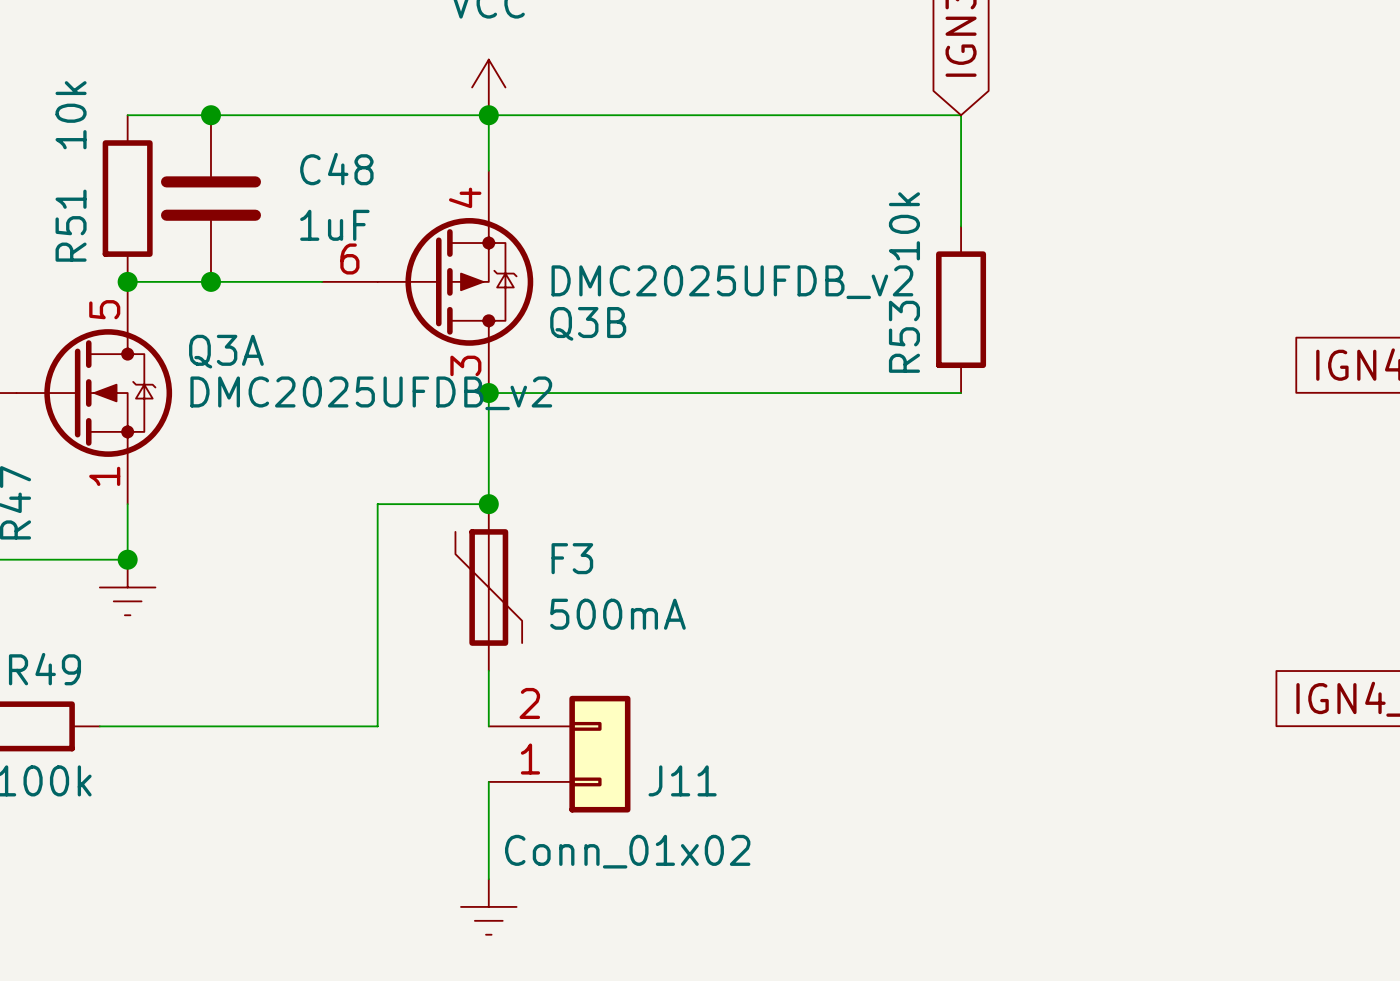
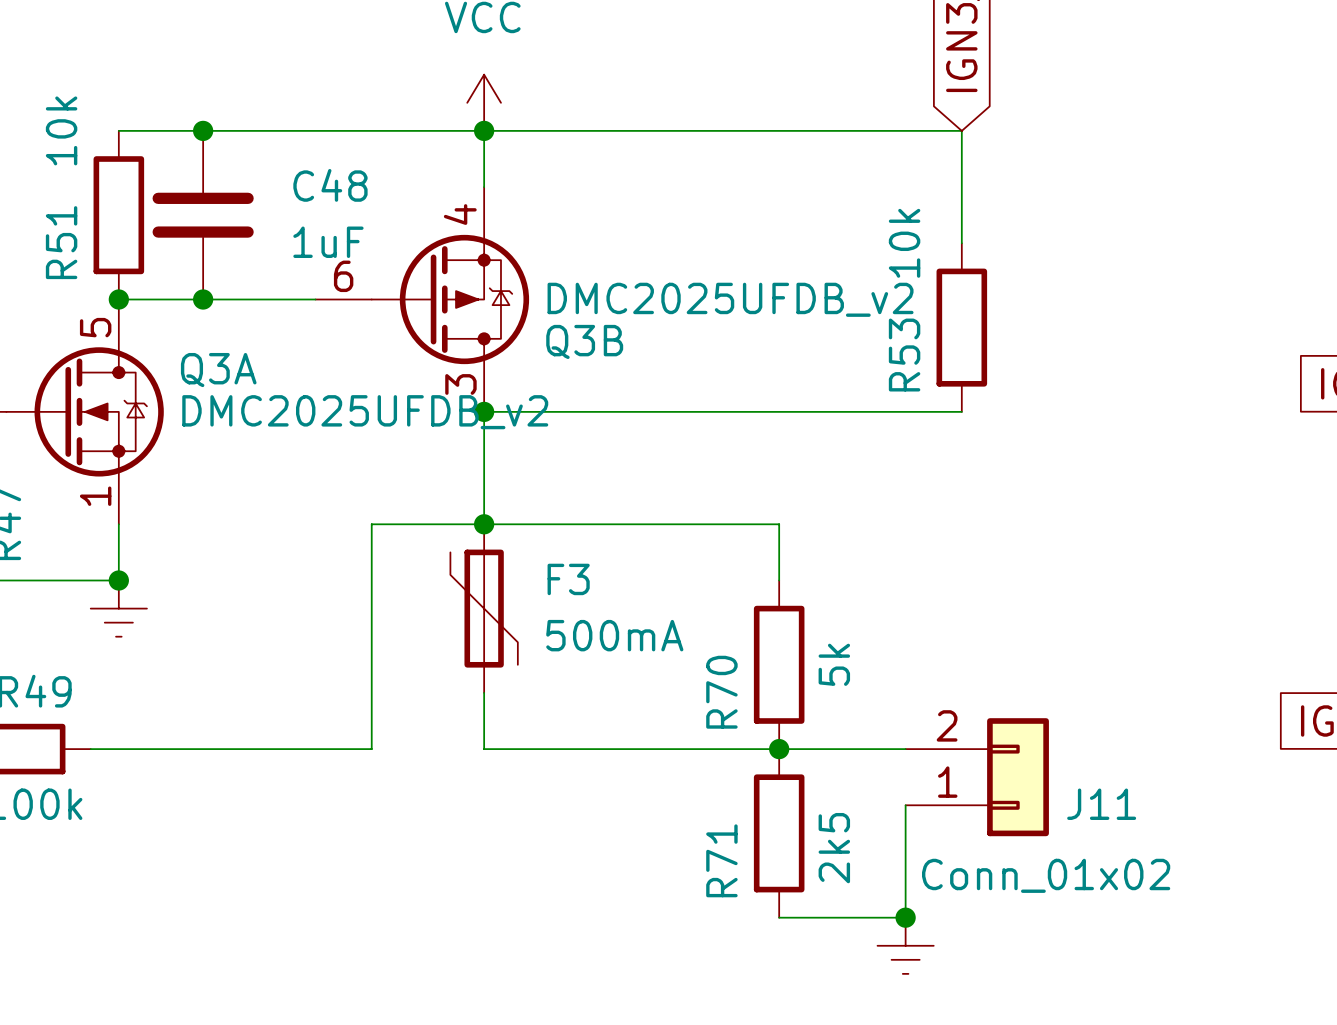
wire: none -> (484, 524) (779, 524) (779, 580)
R70: none -> 5k (779, 664)
wire: none -> (484, 749) (905, 749)
junction: none -> (779, 749)
J11 position: (559, 754) -> (977, 777)
wire: (488, 781) (488, 879) -> none
wire: none -> (905, 805) (905, 917) (779, 917)
R71: none -> 2k5 (779, 833)
junction: none -> (905, 917)
power symbol position: (488, 906) -> (905, 945)

